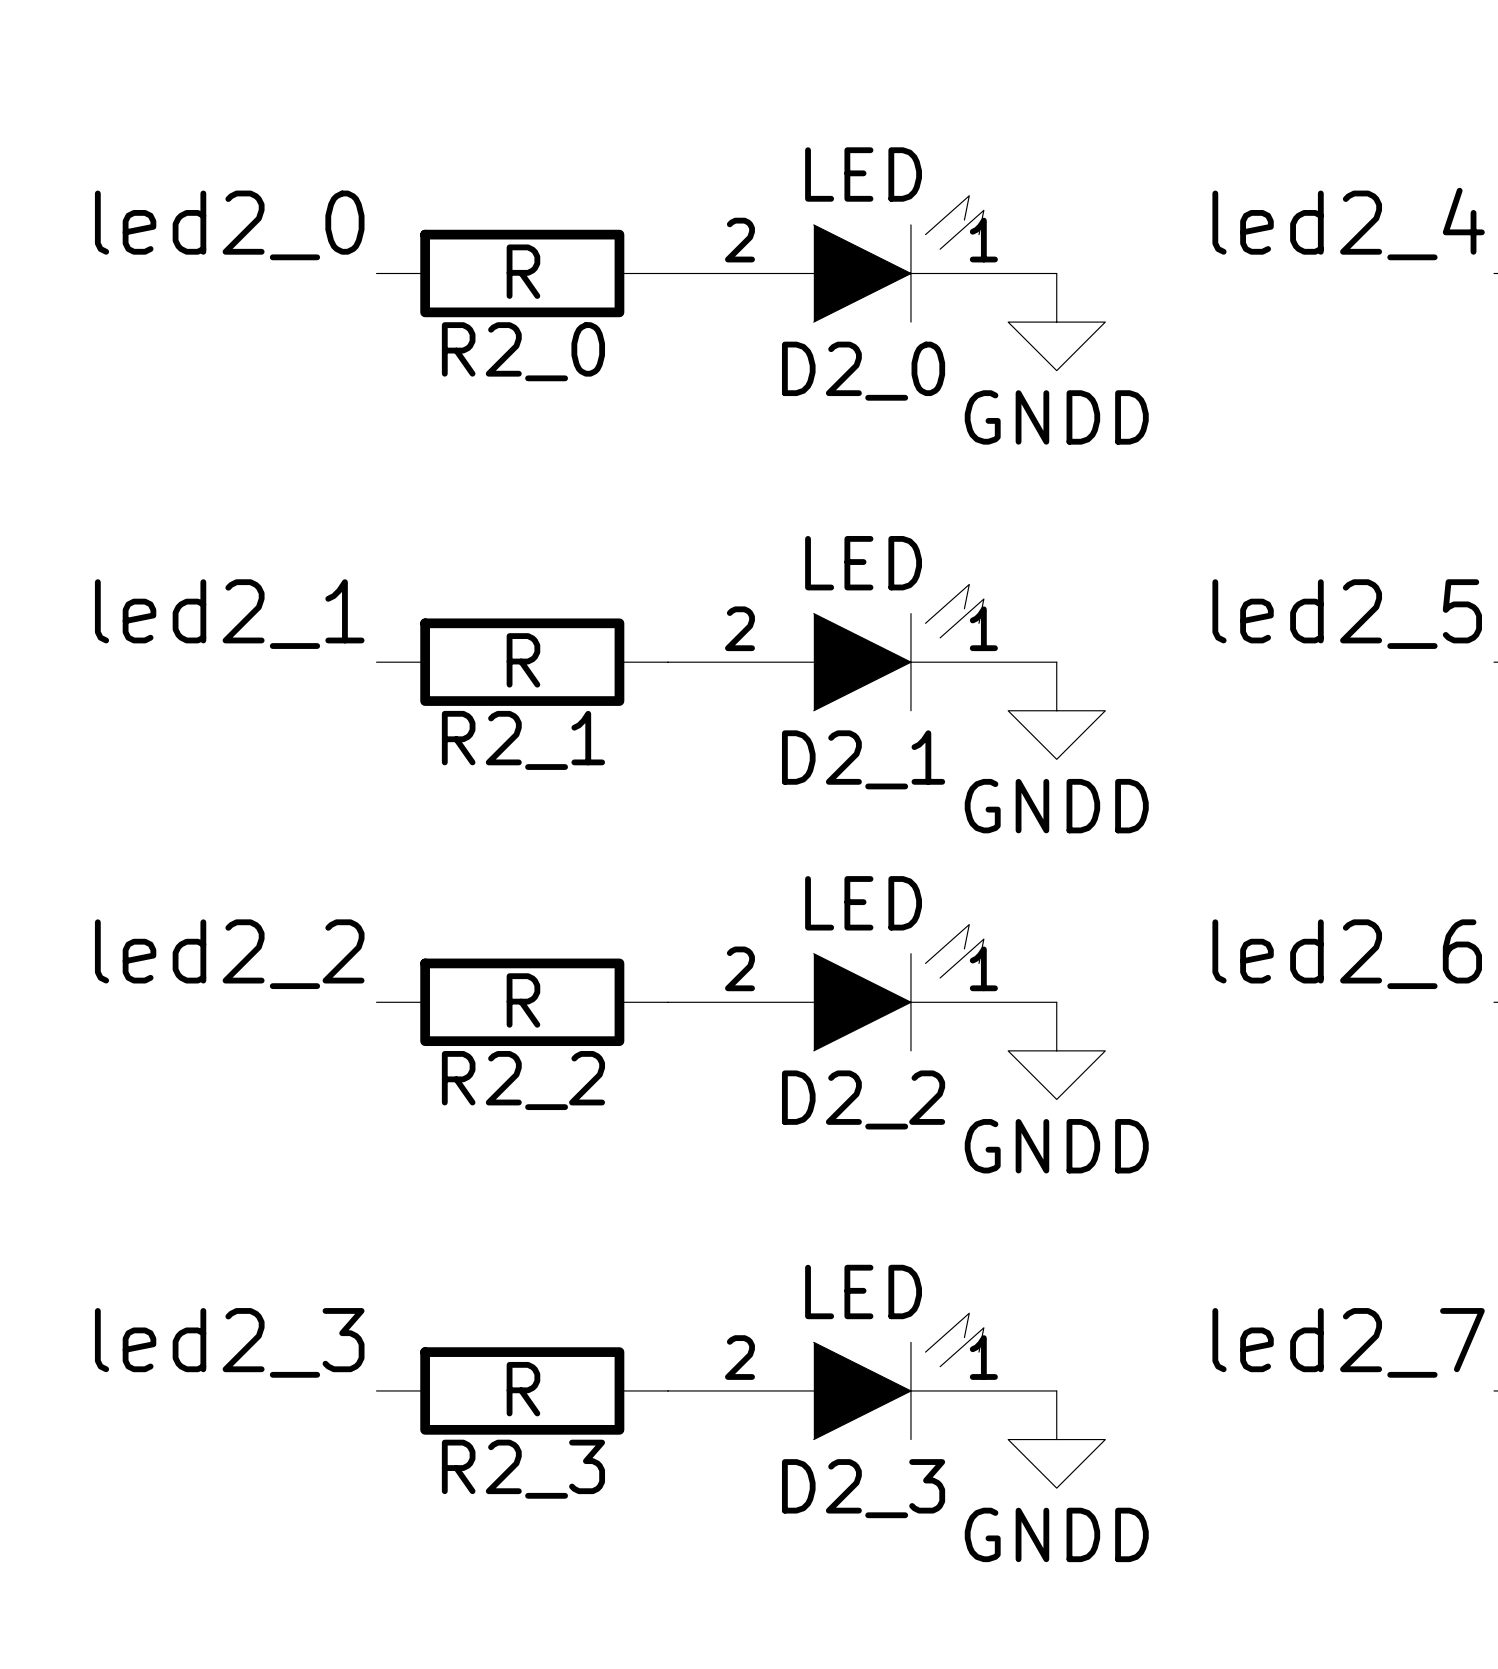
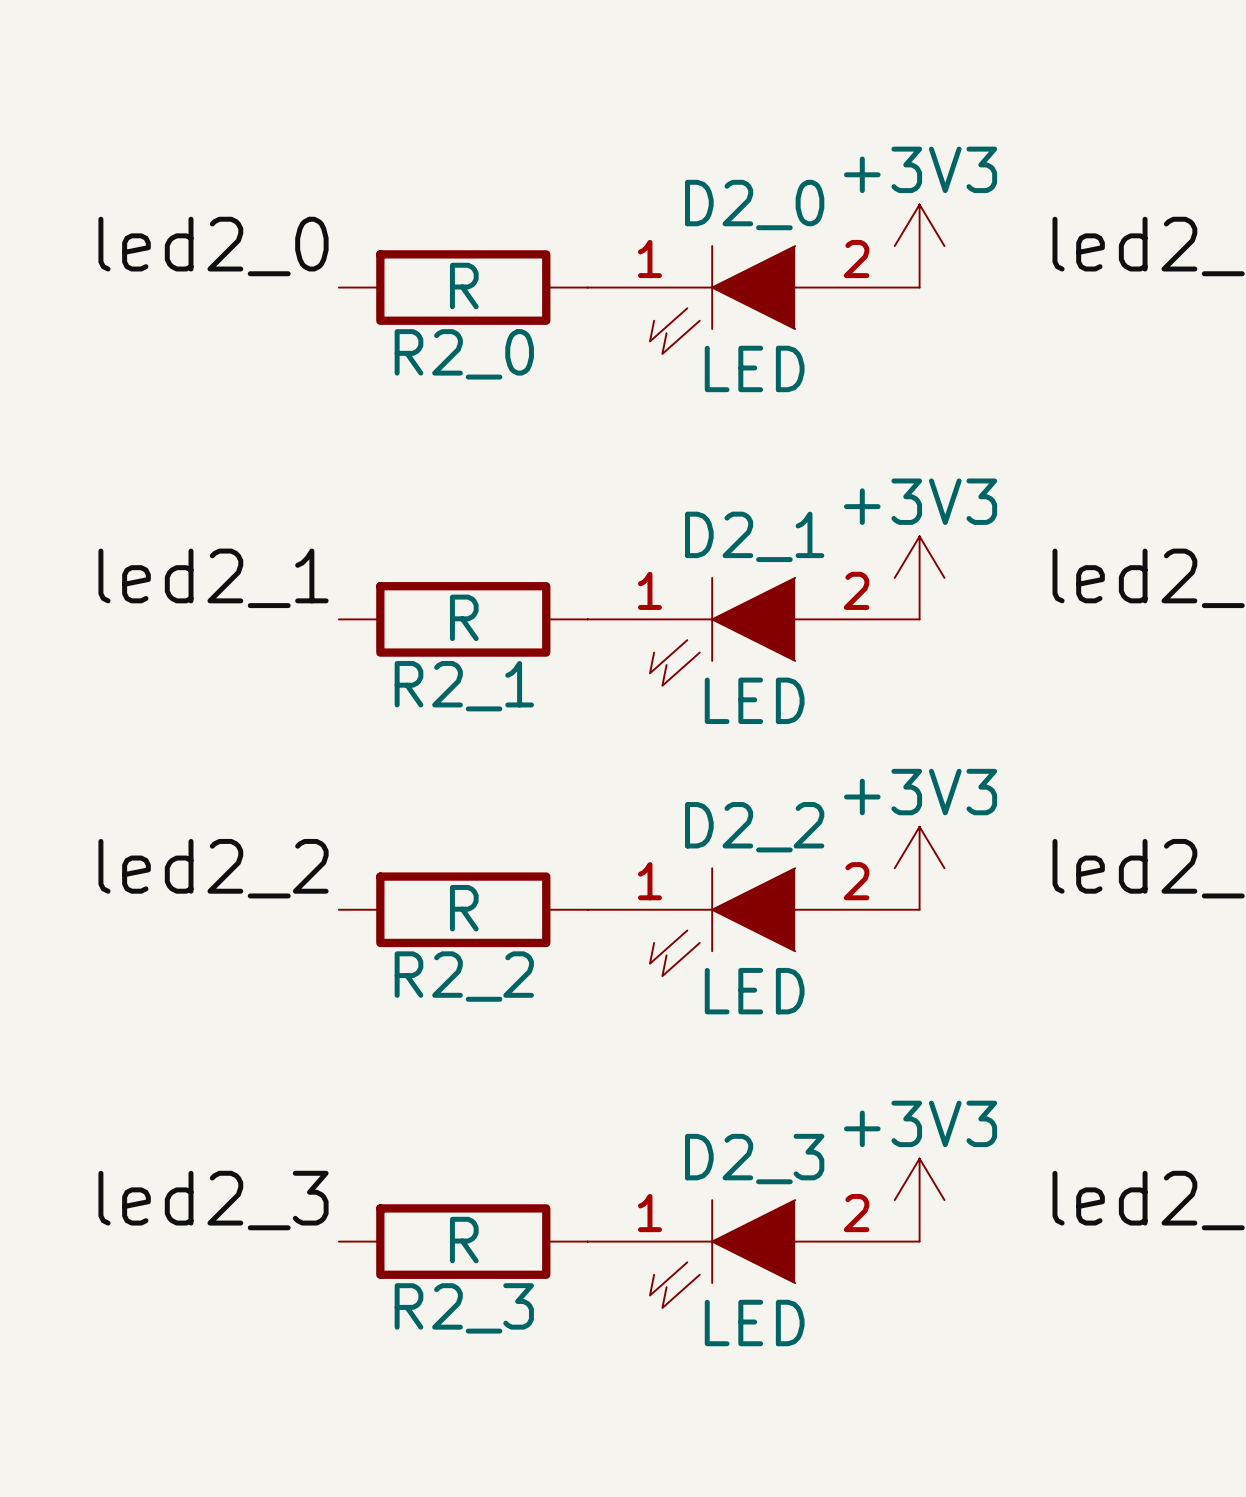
power symbol: none -> +3V3 (919, 246)
D2_0 rotation: 0° (898, 258) -> 180° (722, 299)
power symbol: GNDD (1056, 322) -> none
power symbol: none -> +3V3 (919, 577)
D2_1 rotation: 0° (898, 647) -> 180° (722, 631)
power symbol: GNDD (1056, 710) -> none
power symbol: none -> +3V3 (919, 868)
D2_2 rotation: 0° (898, 987) -> 180° (722, 922)
power symbol: GNDD (1056, 1050) -> none
power symbol: none -> +3V3 (919, 1200)
D2_3 rotation: 0° (898, 1376) -> 180° (722, 1254)
power symbol: GNDD (1056, 1439) -> none

